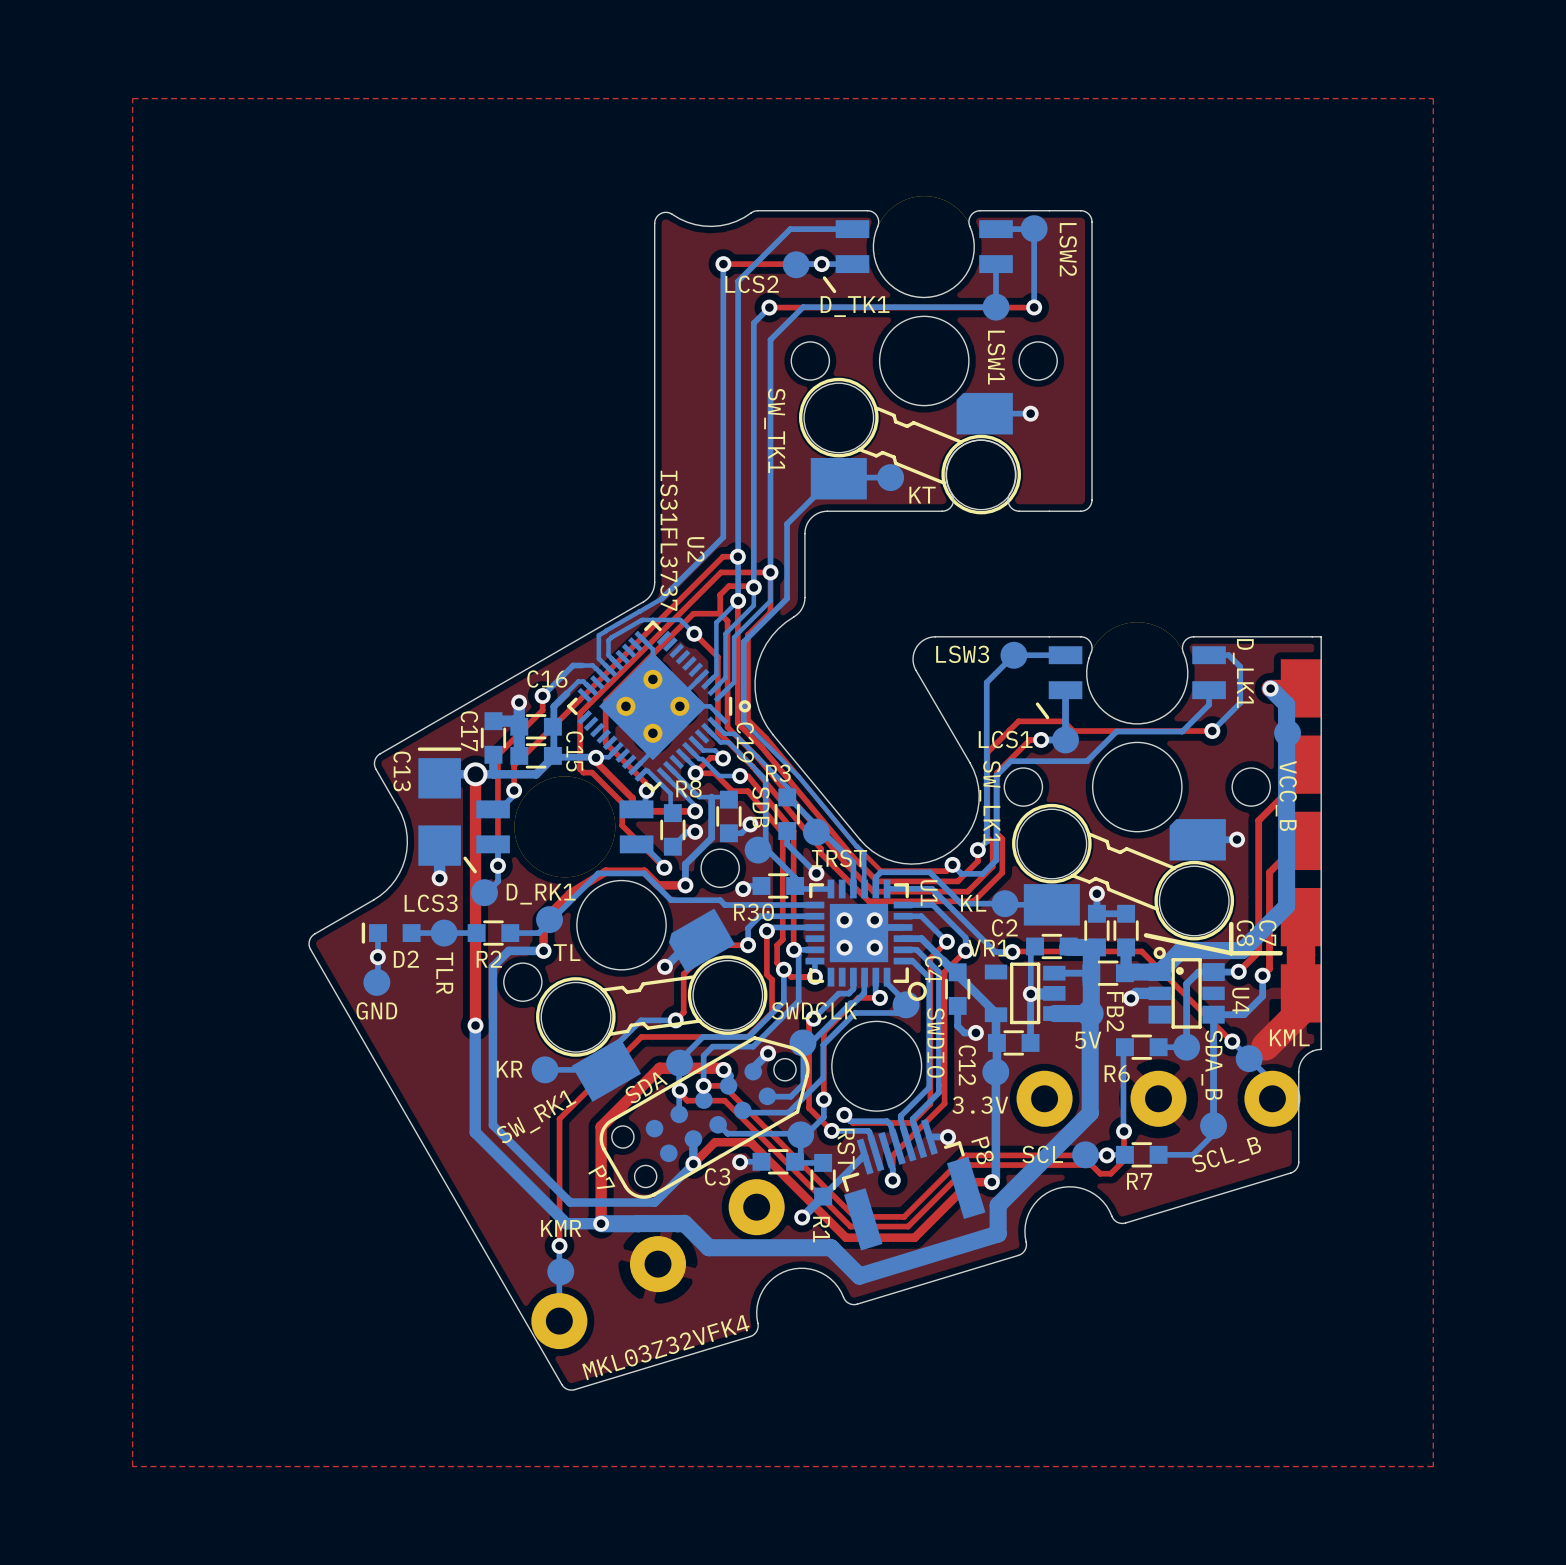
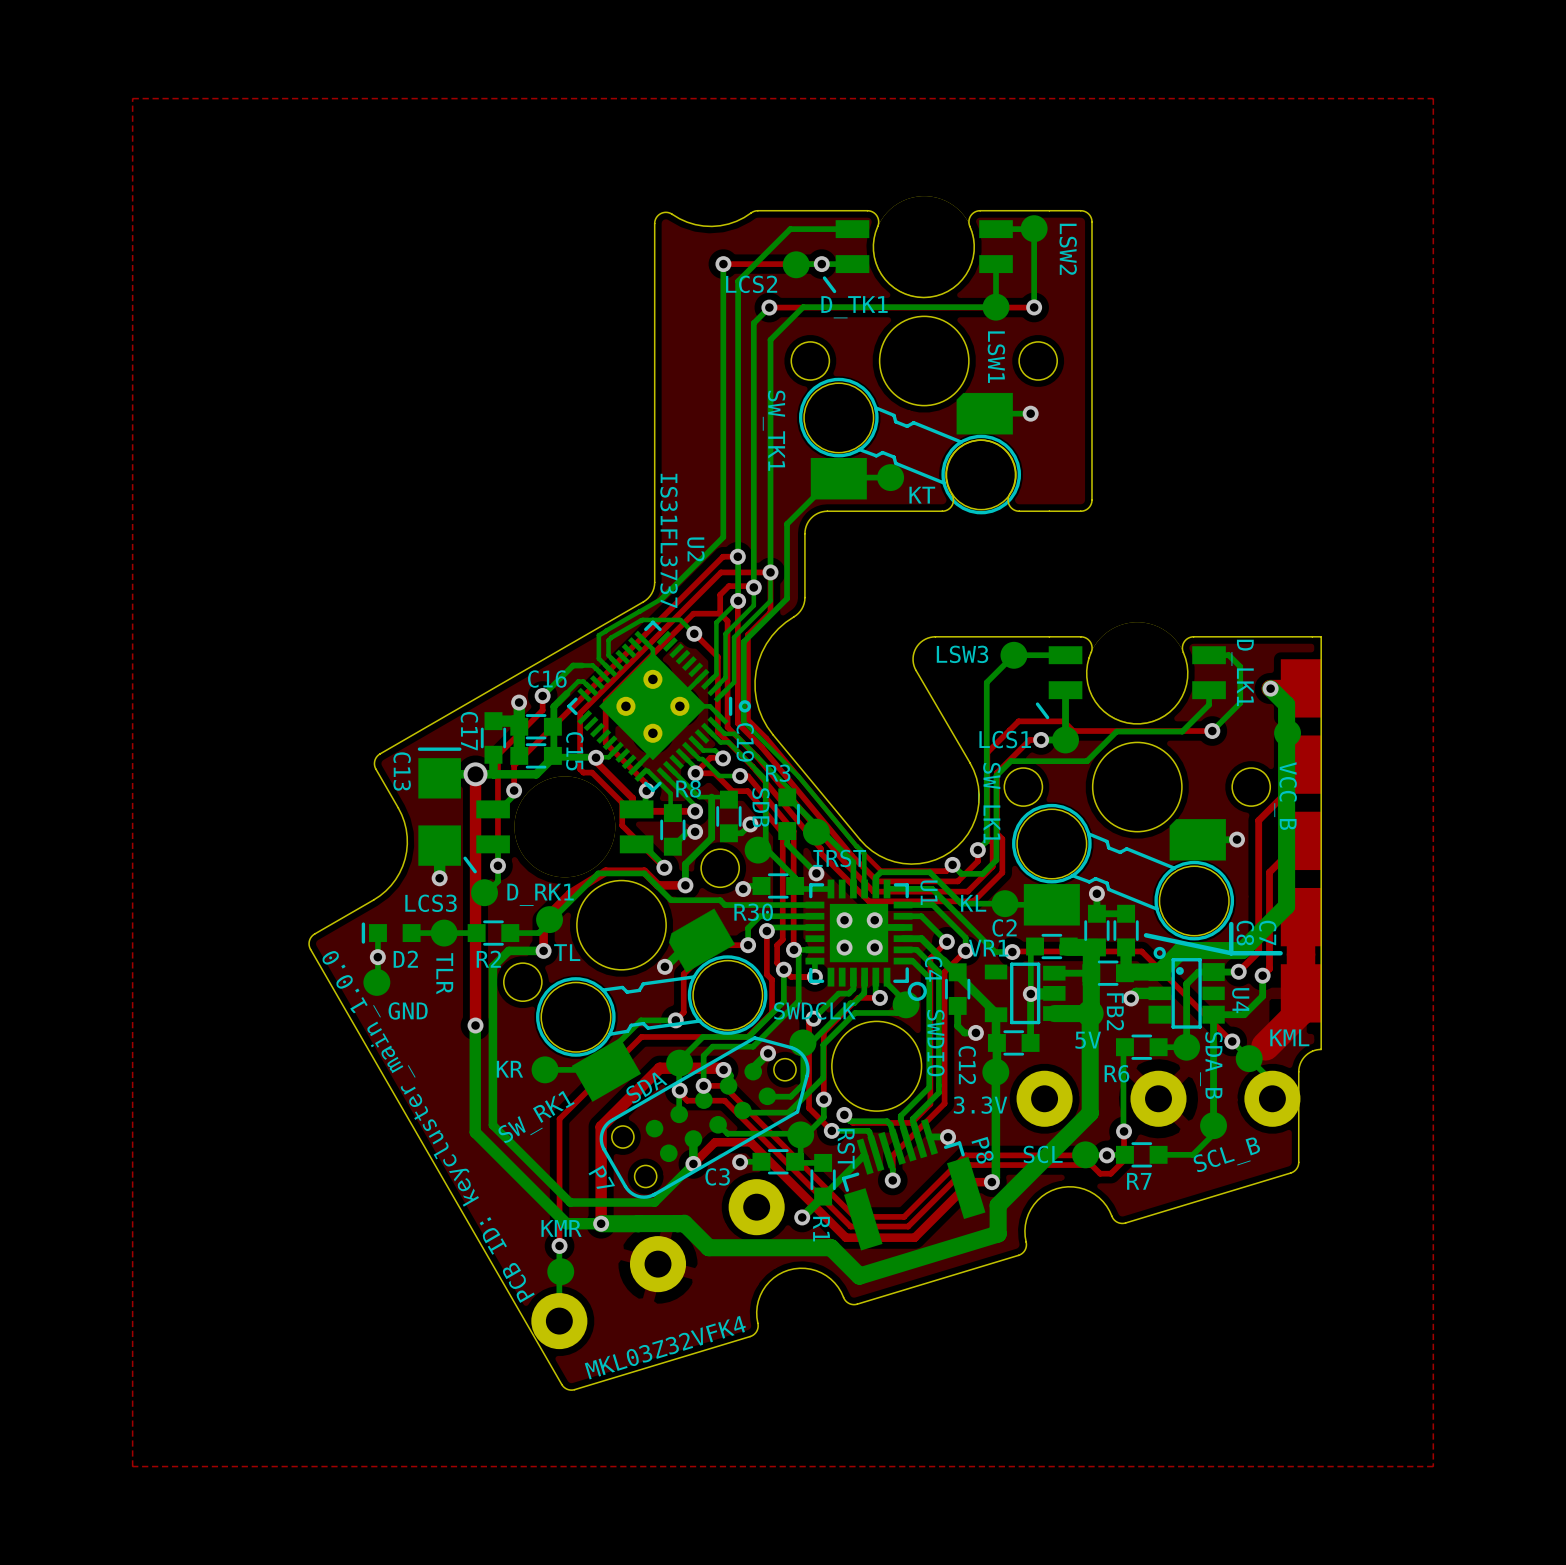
part value position: GND (376, 1010) -> GND (408, 1010)
text: none -> PCB ID: keycluster_main_1.0.0 (428, 1126)

